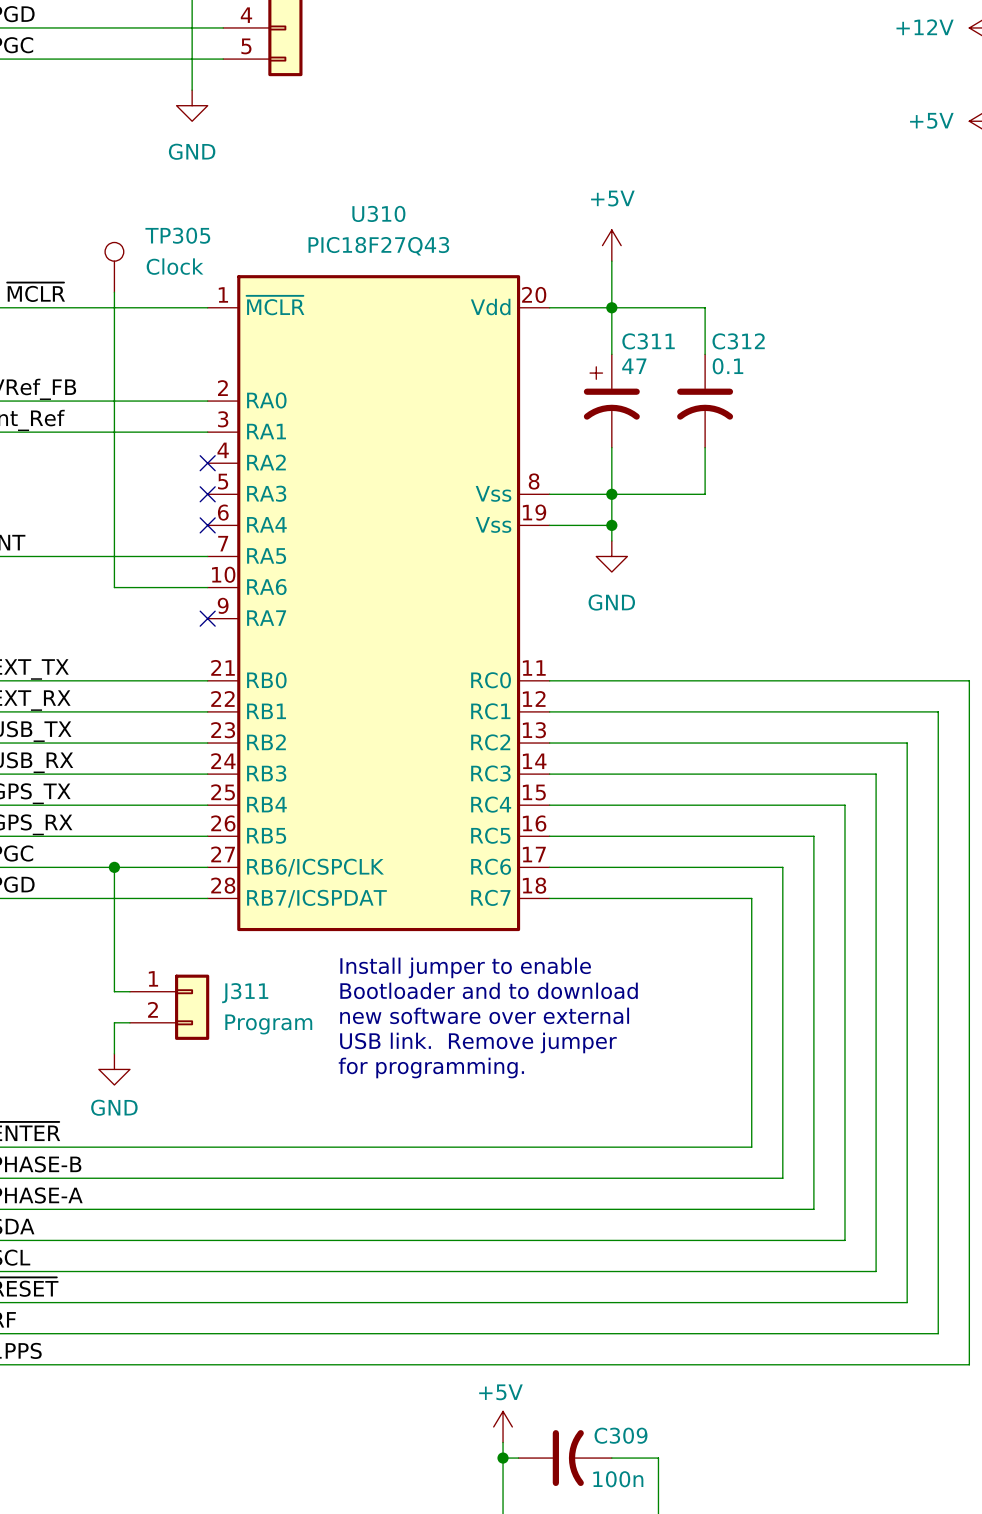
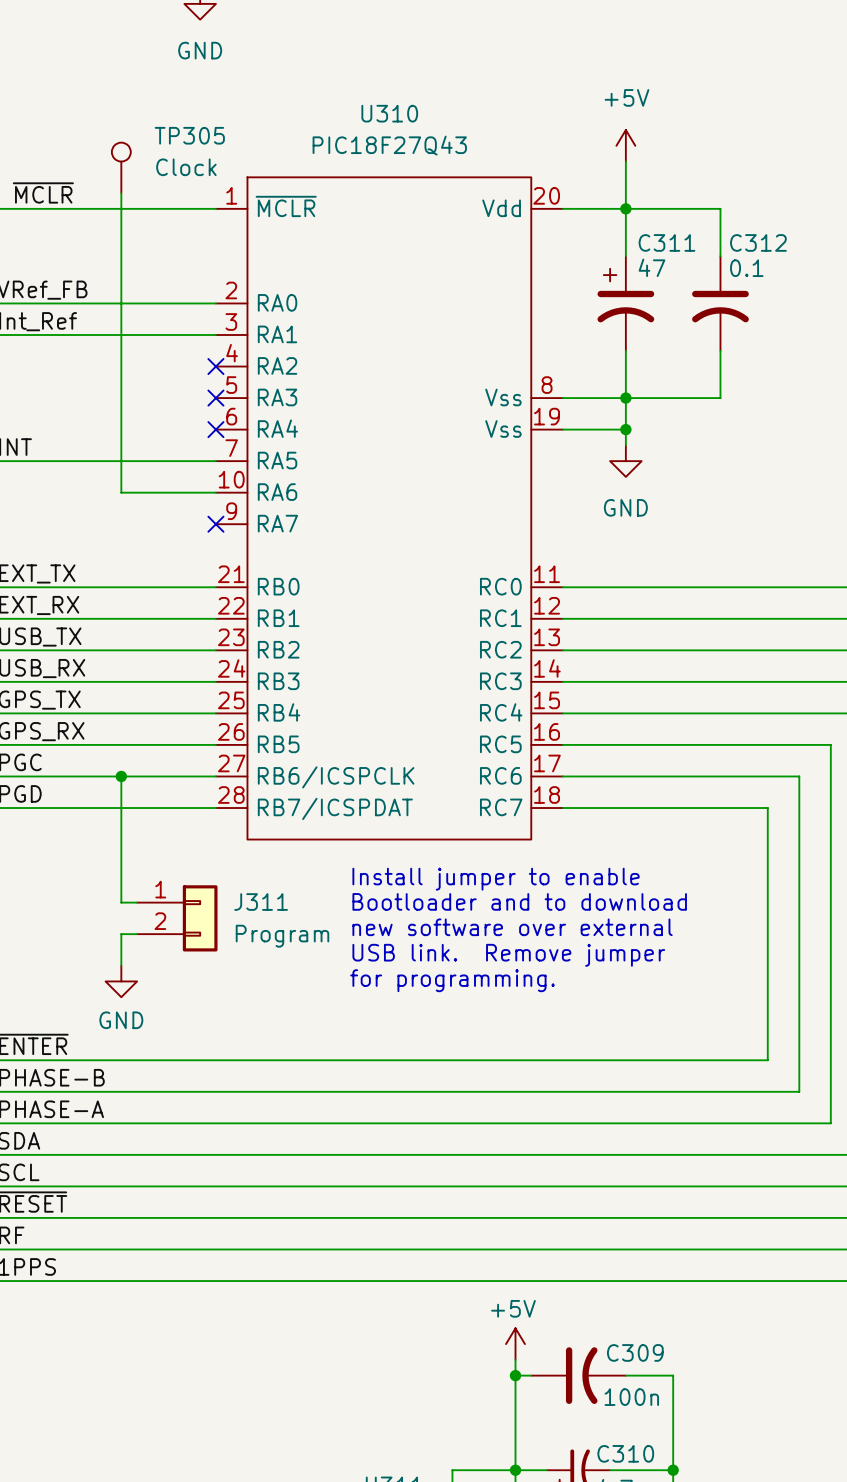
U310 symbol: [207, 275, 550, 932] -> [215, 177, 563, 840]

